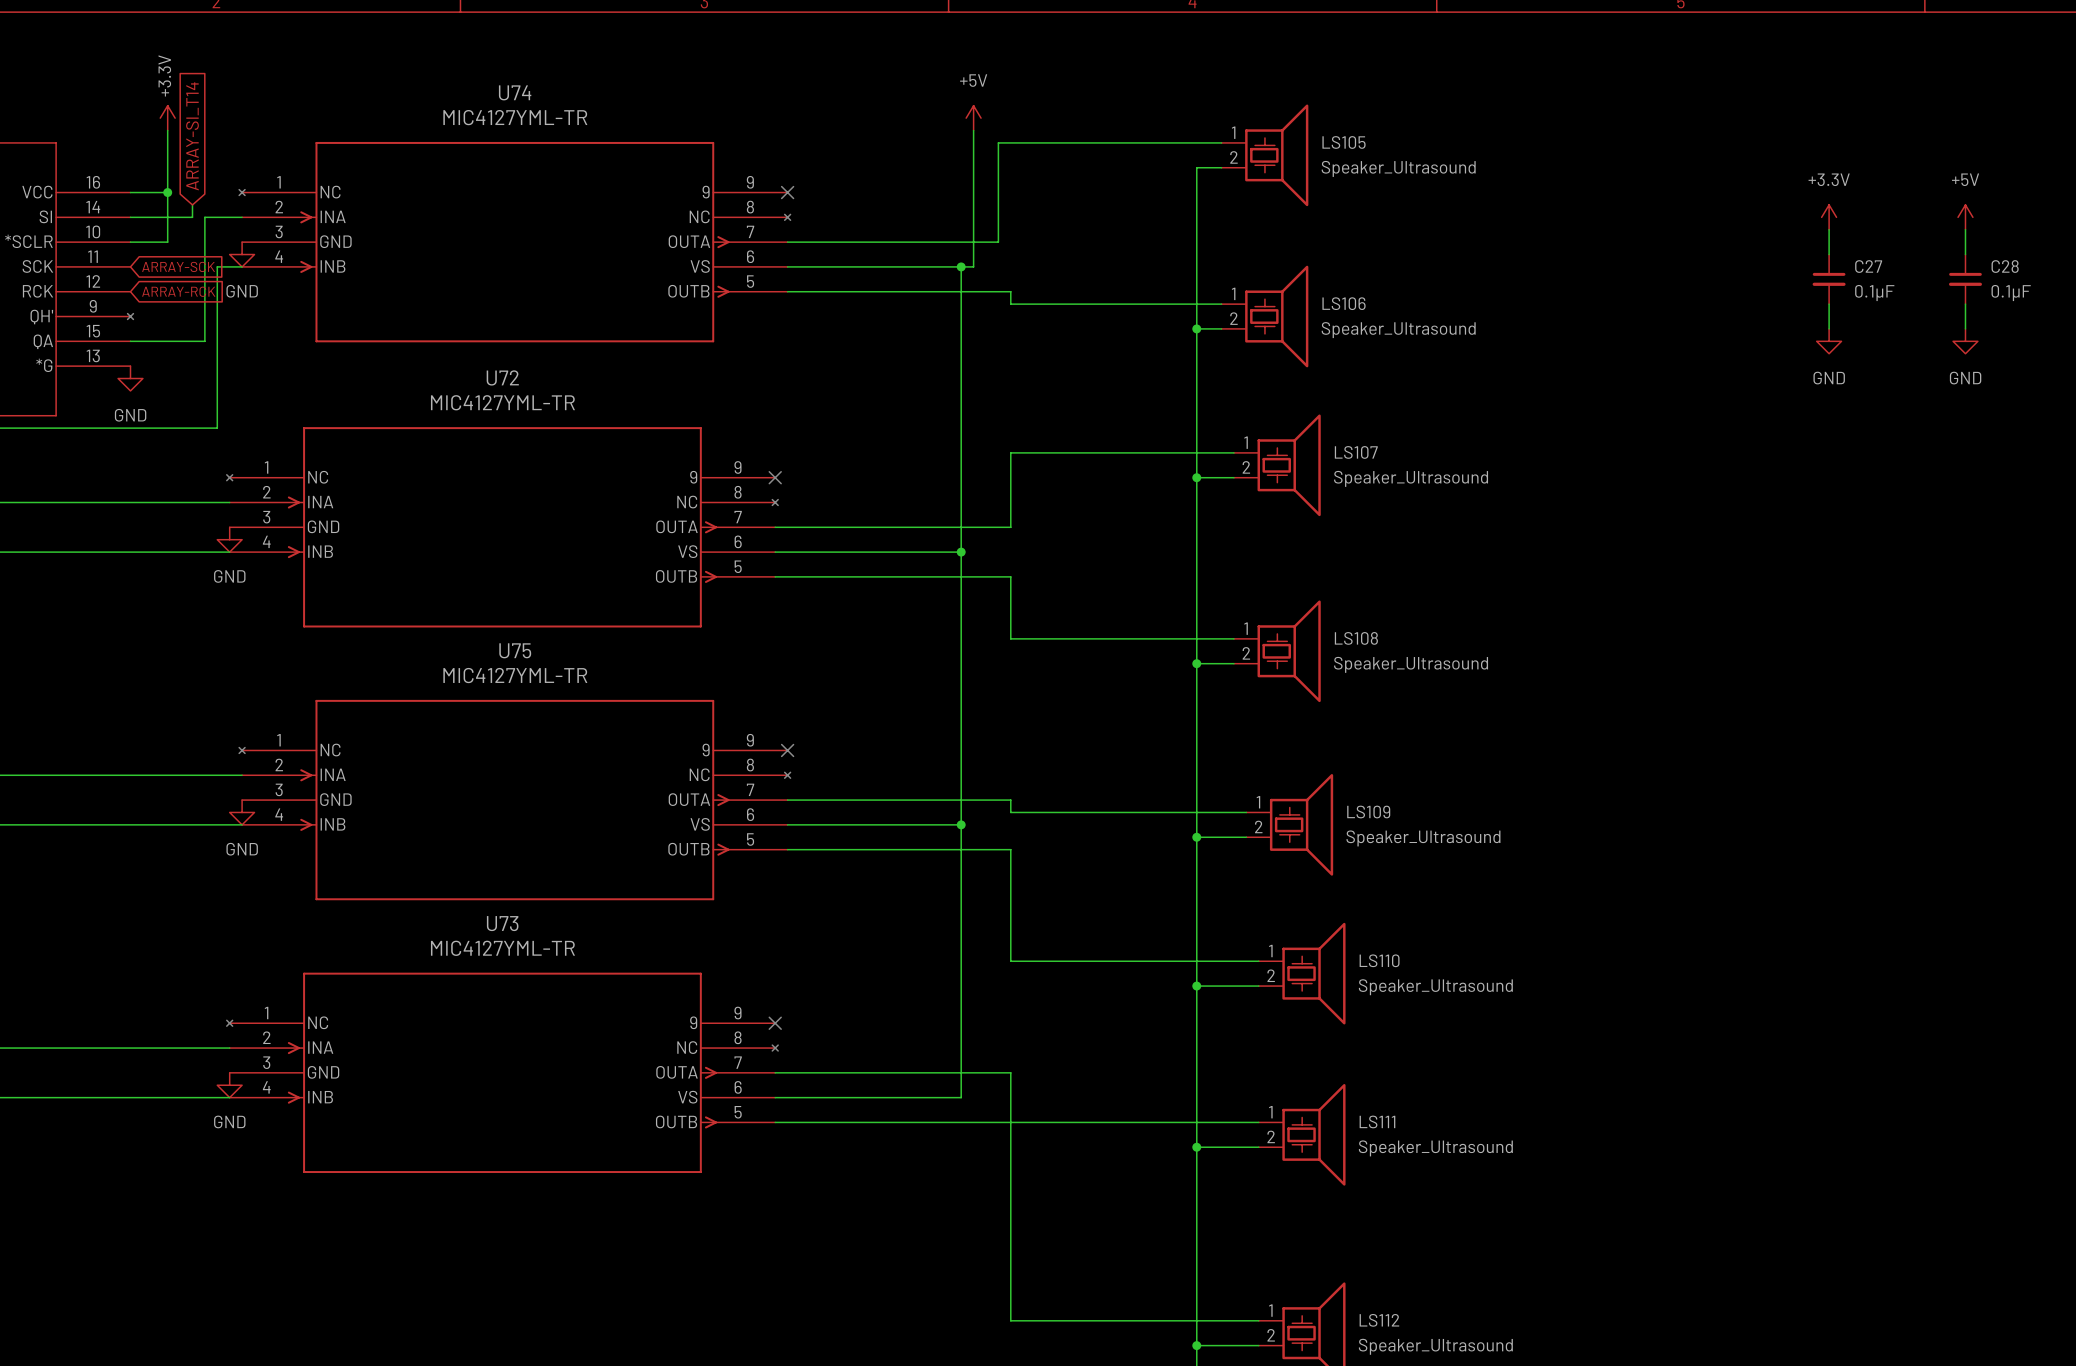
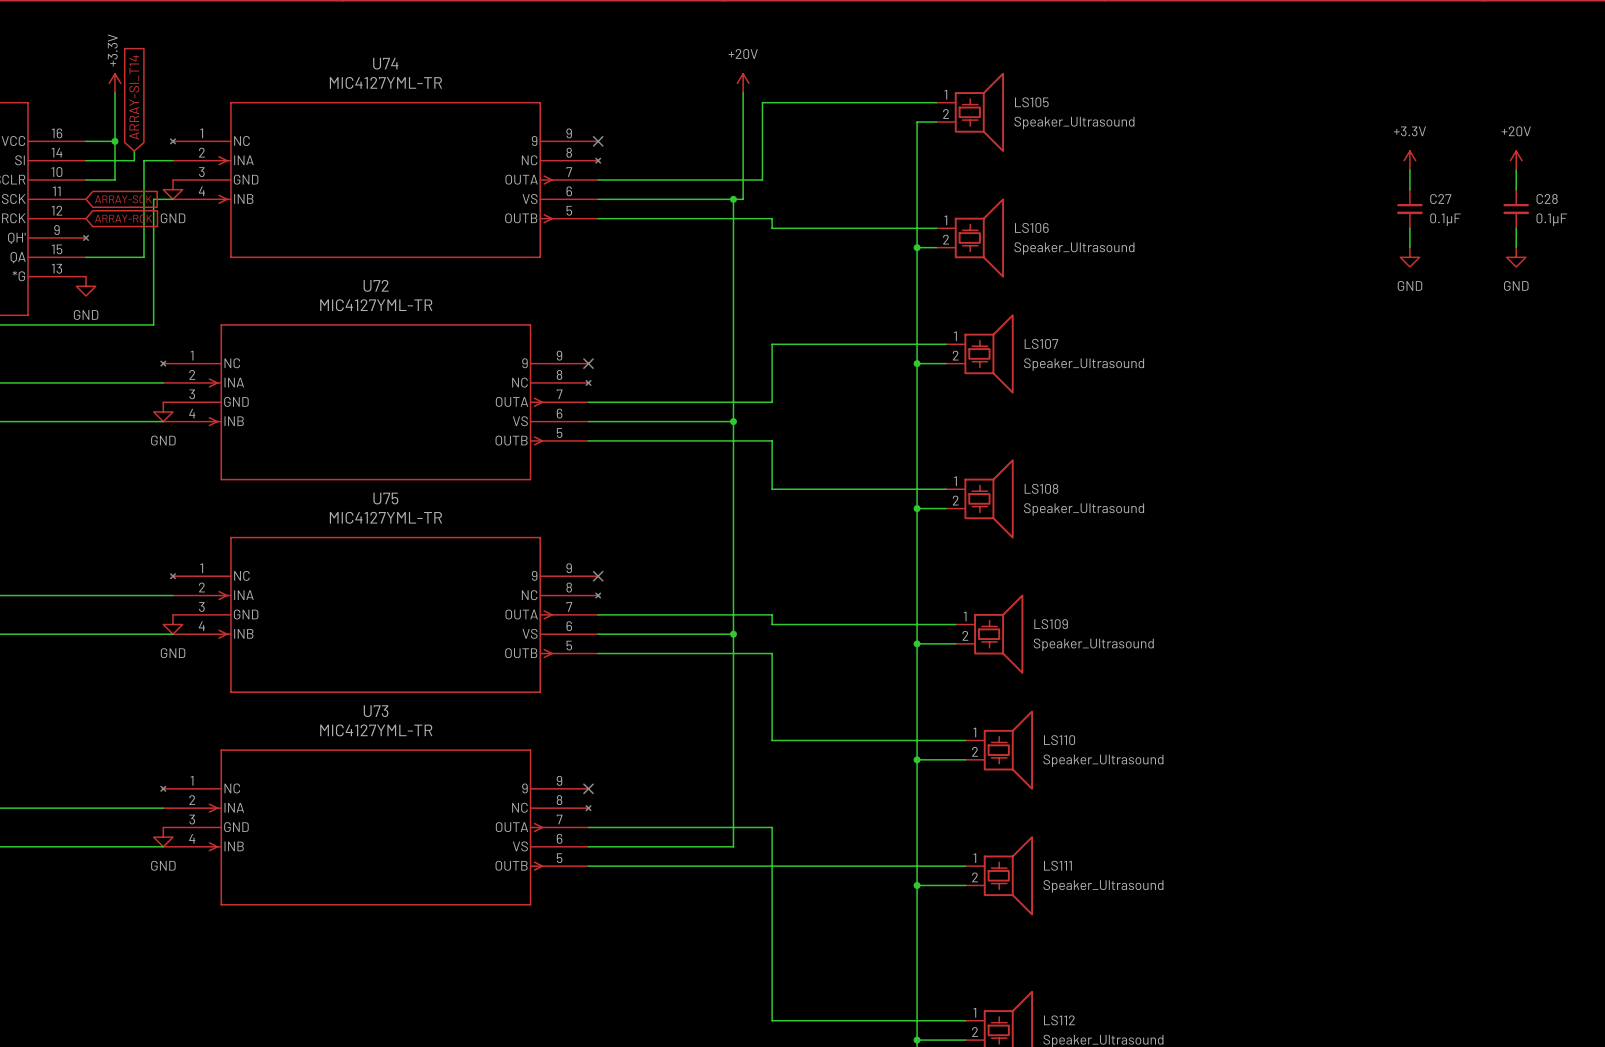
power symbol: +5V (973, 118) -> +20V (743, 83)
power symbol: +5V (1965, 217) -> +20V (1516, 160)

